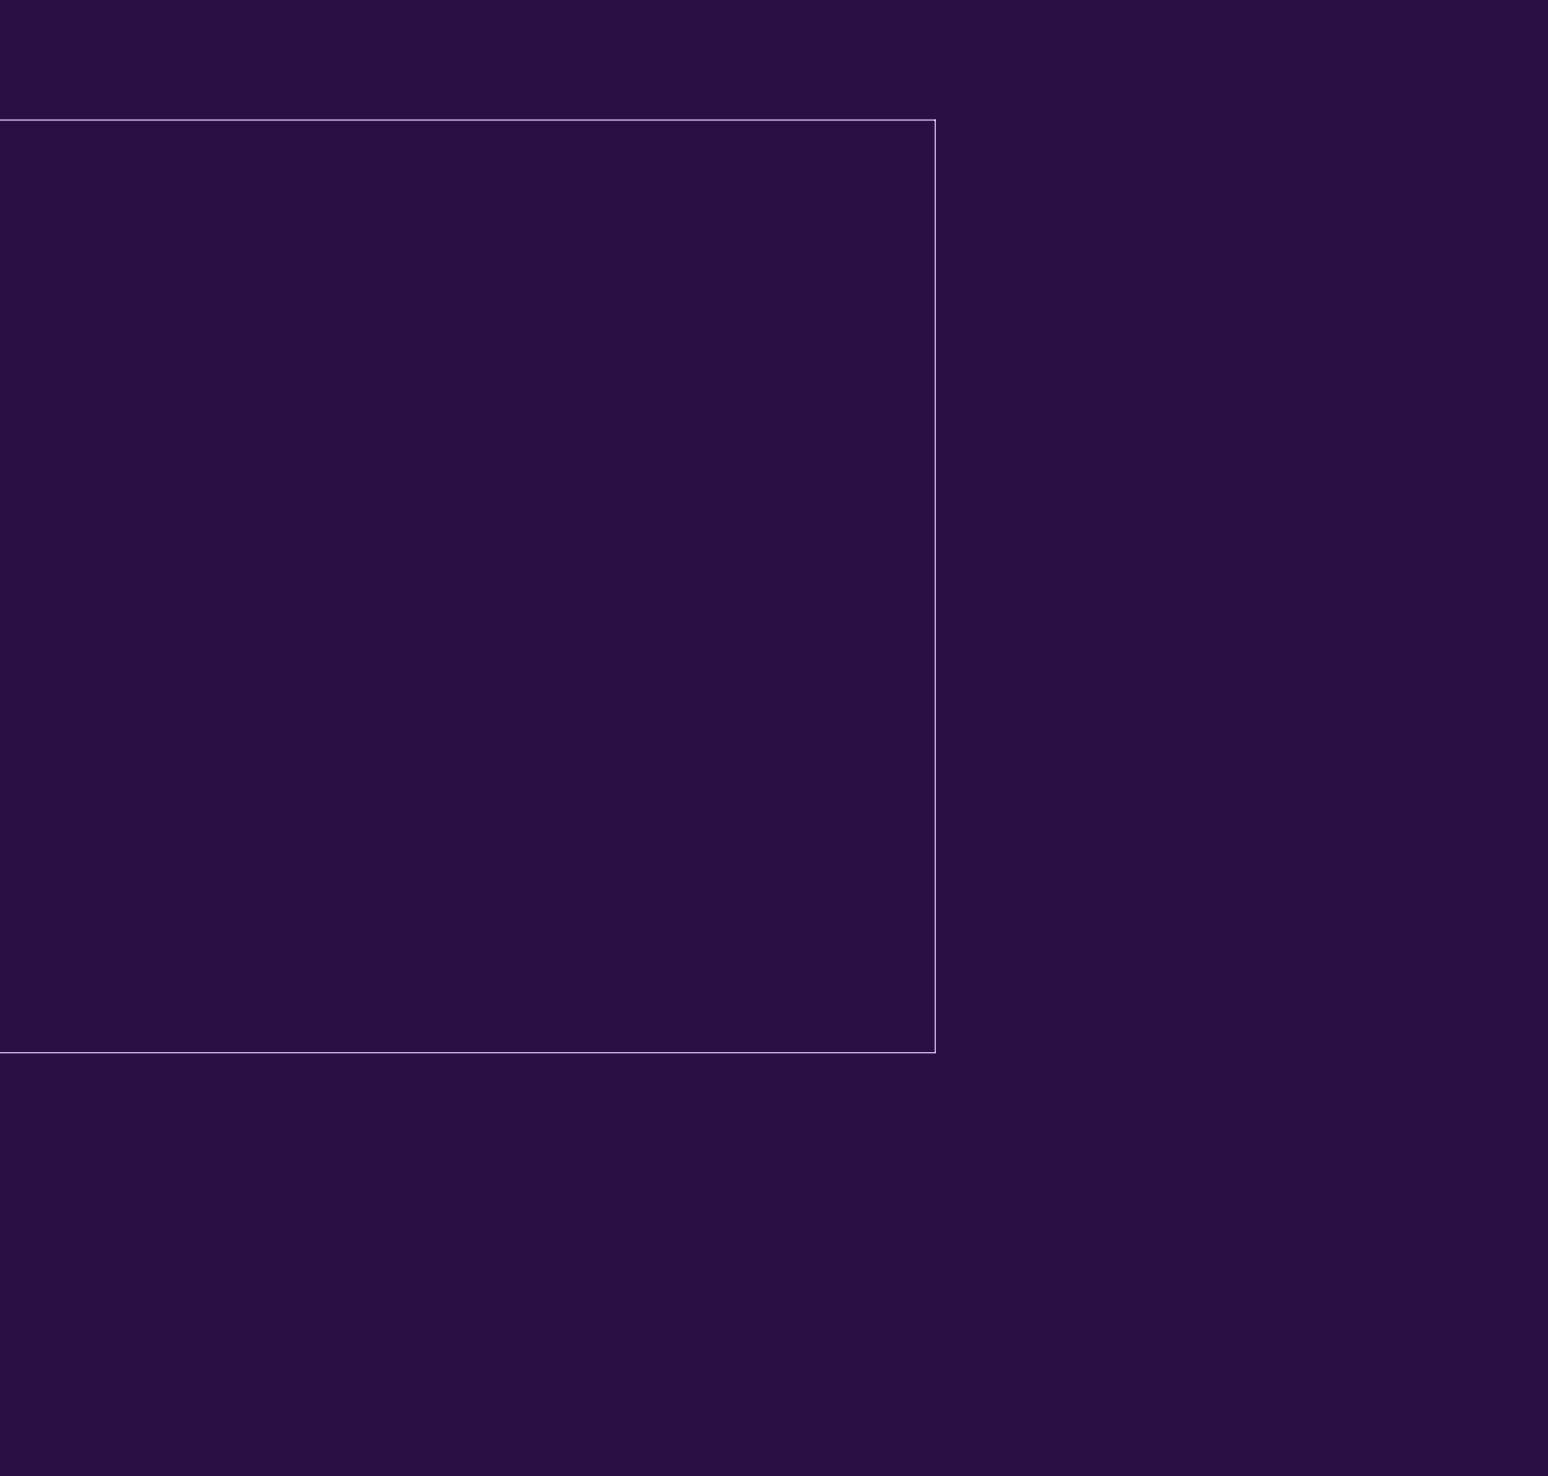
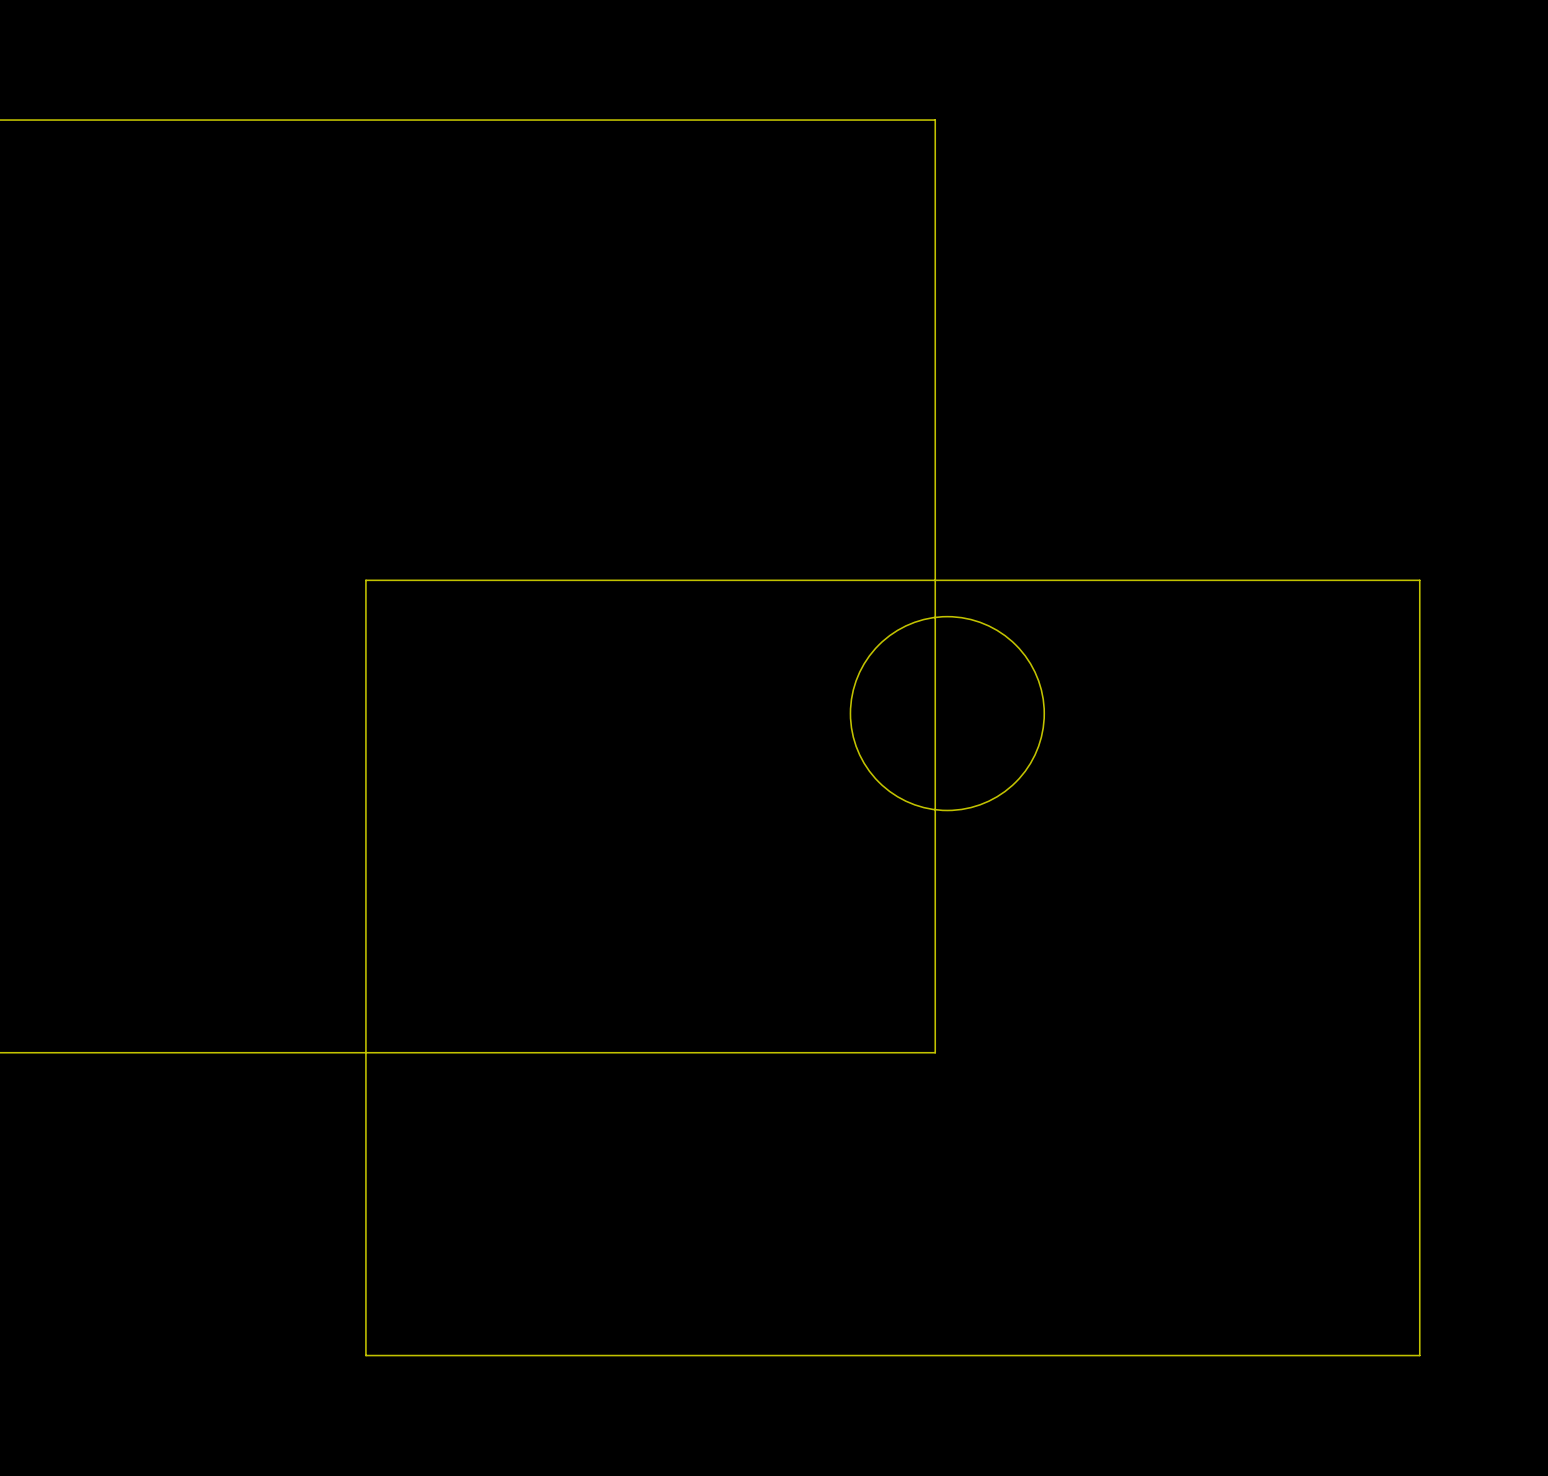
board edge: none -> (1419, 580) (1419, 1355) (365, 1355) (365, 580) (1419, 580)
round board edge: none -> [849, 616, 1045, 812]

